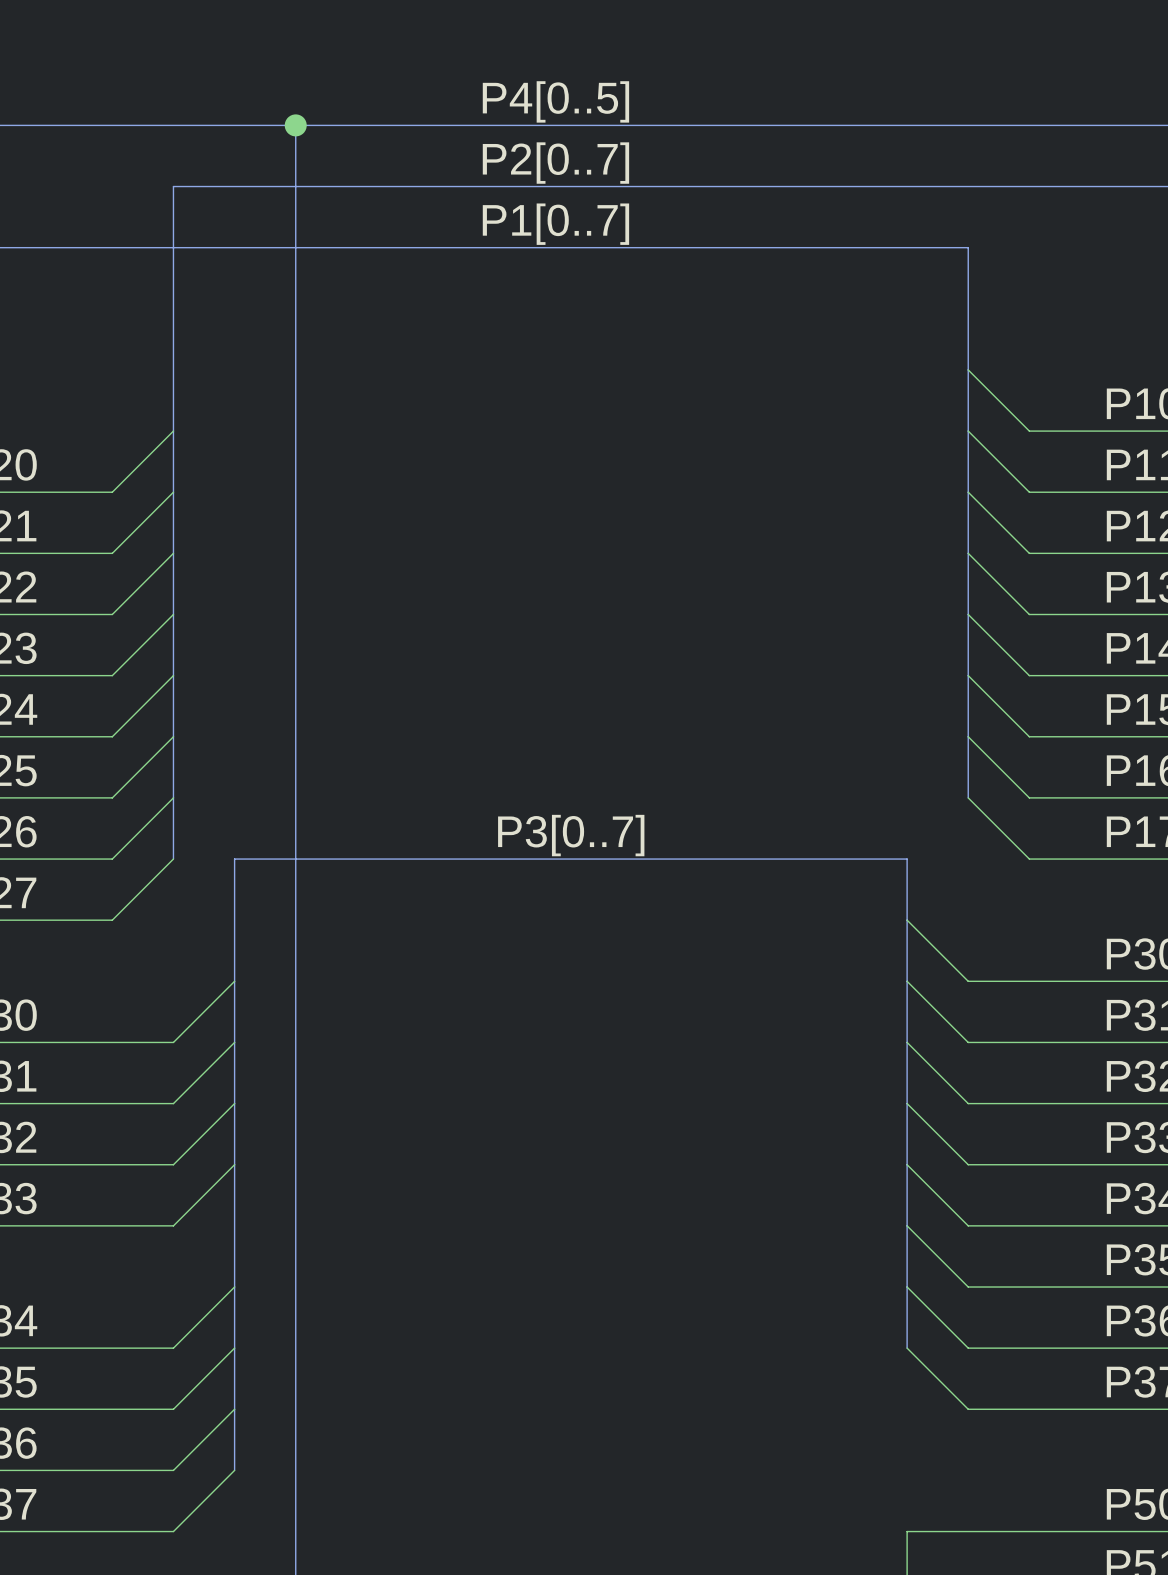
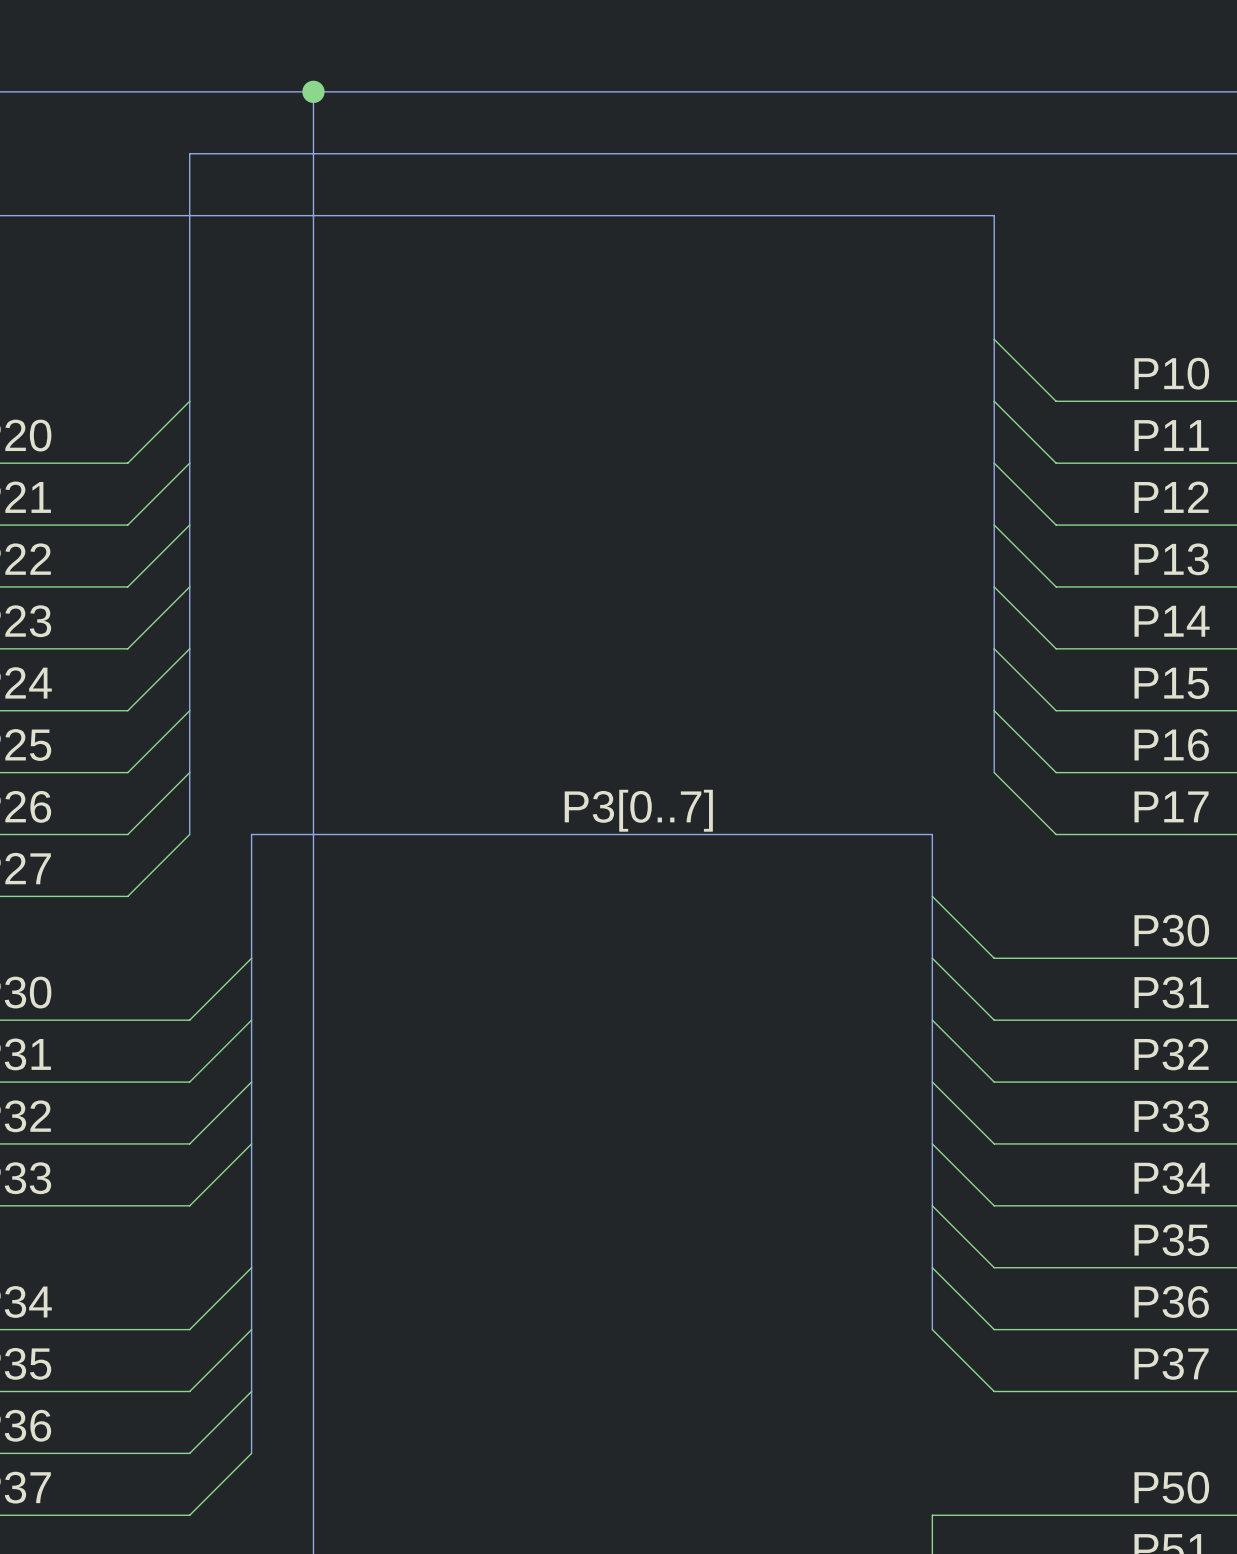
label: P4[0..5] (555, 101) -> none
label: P2[0..7] (555, 163) -> none
label: P1[0..7] (555, 224) -> none
label position: P3[0..7] (571, 835) -> P3[0..7] (638, 810)

